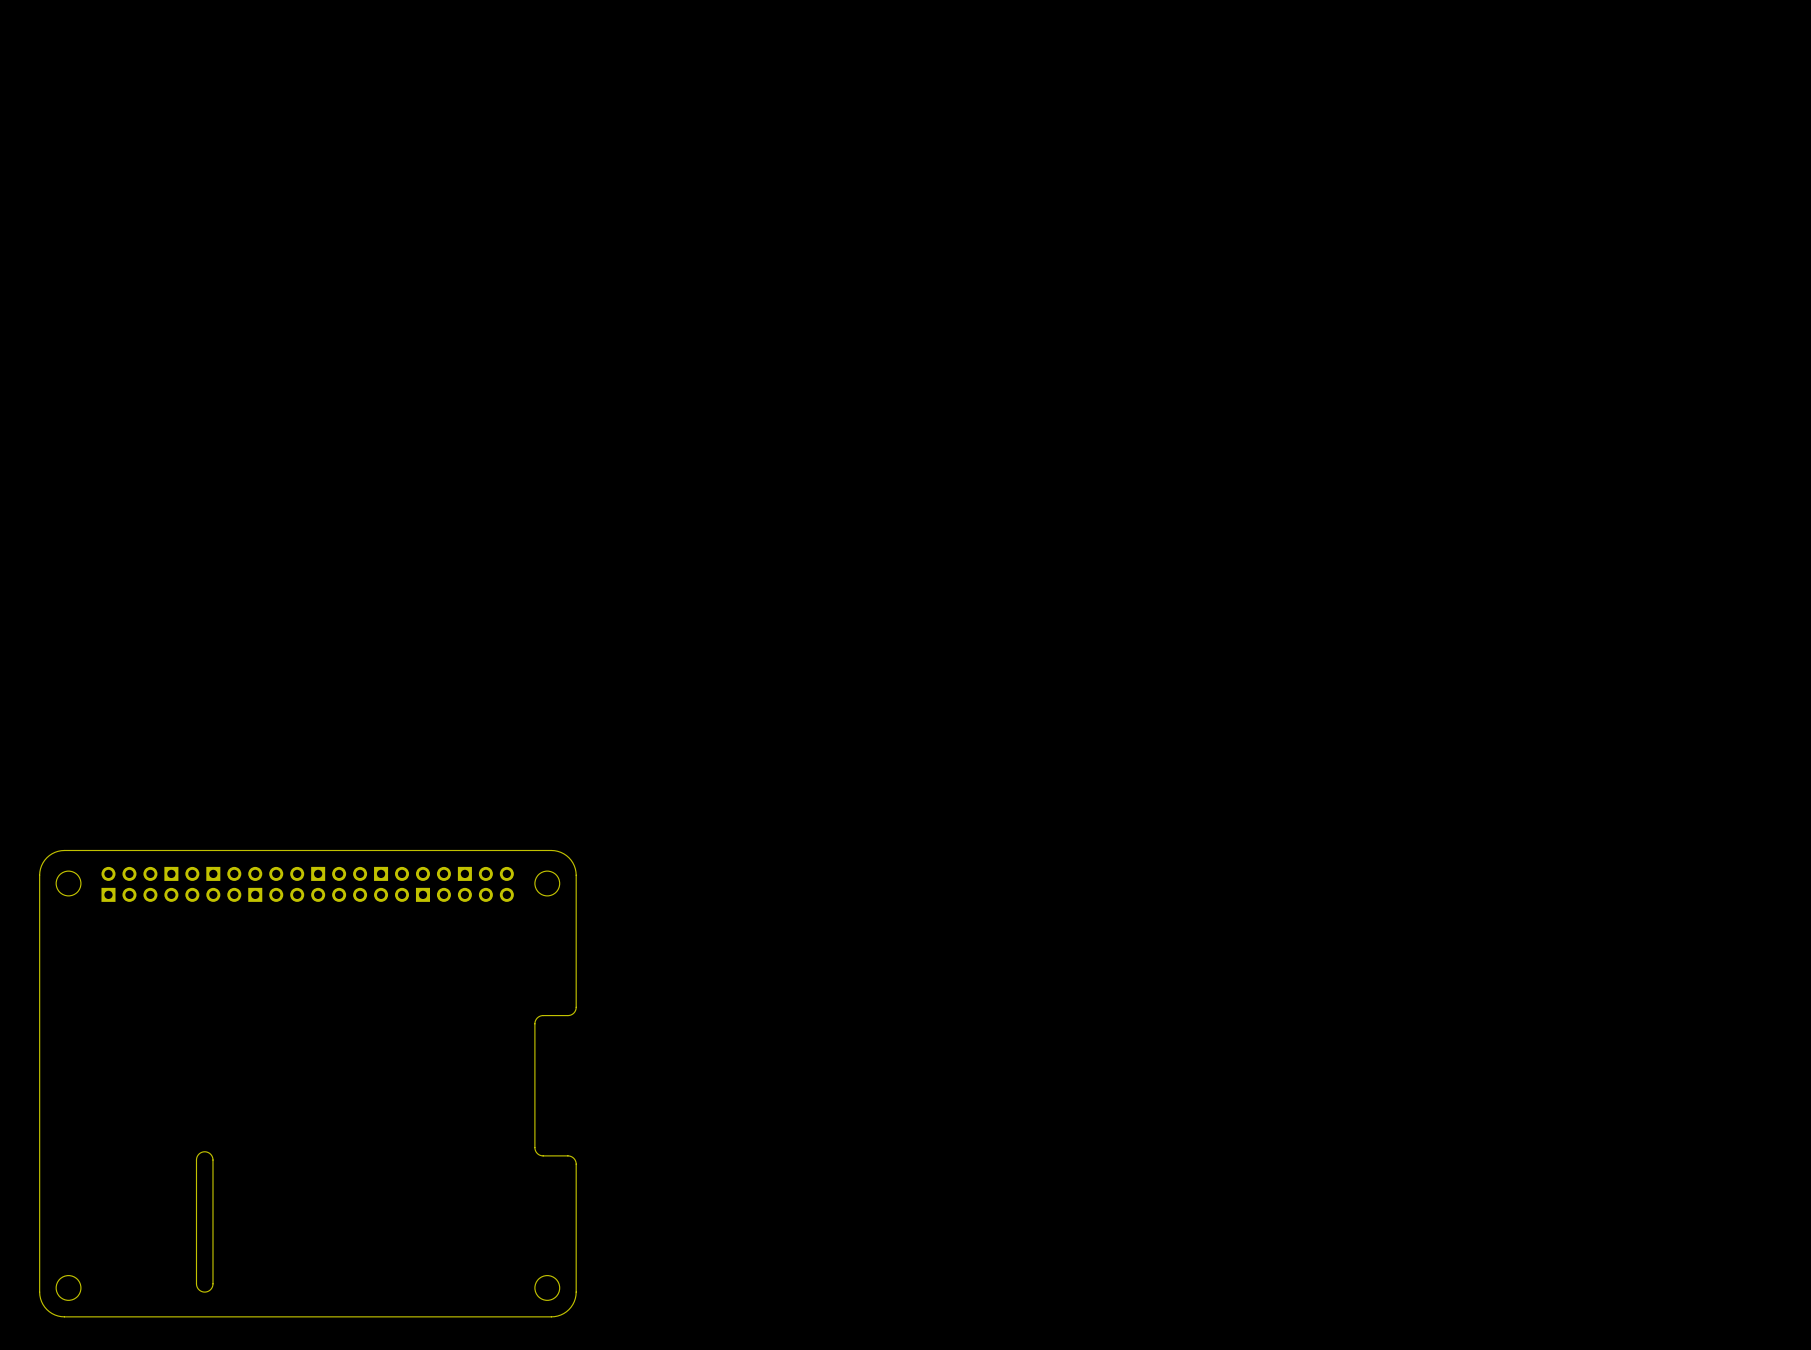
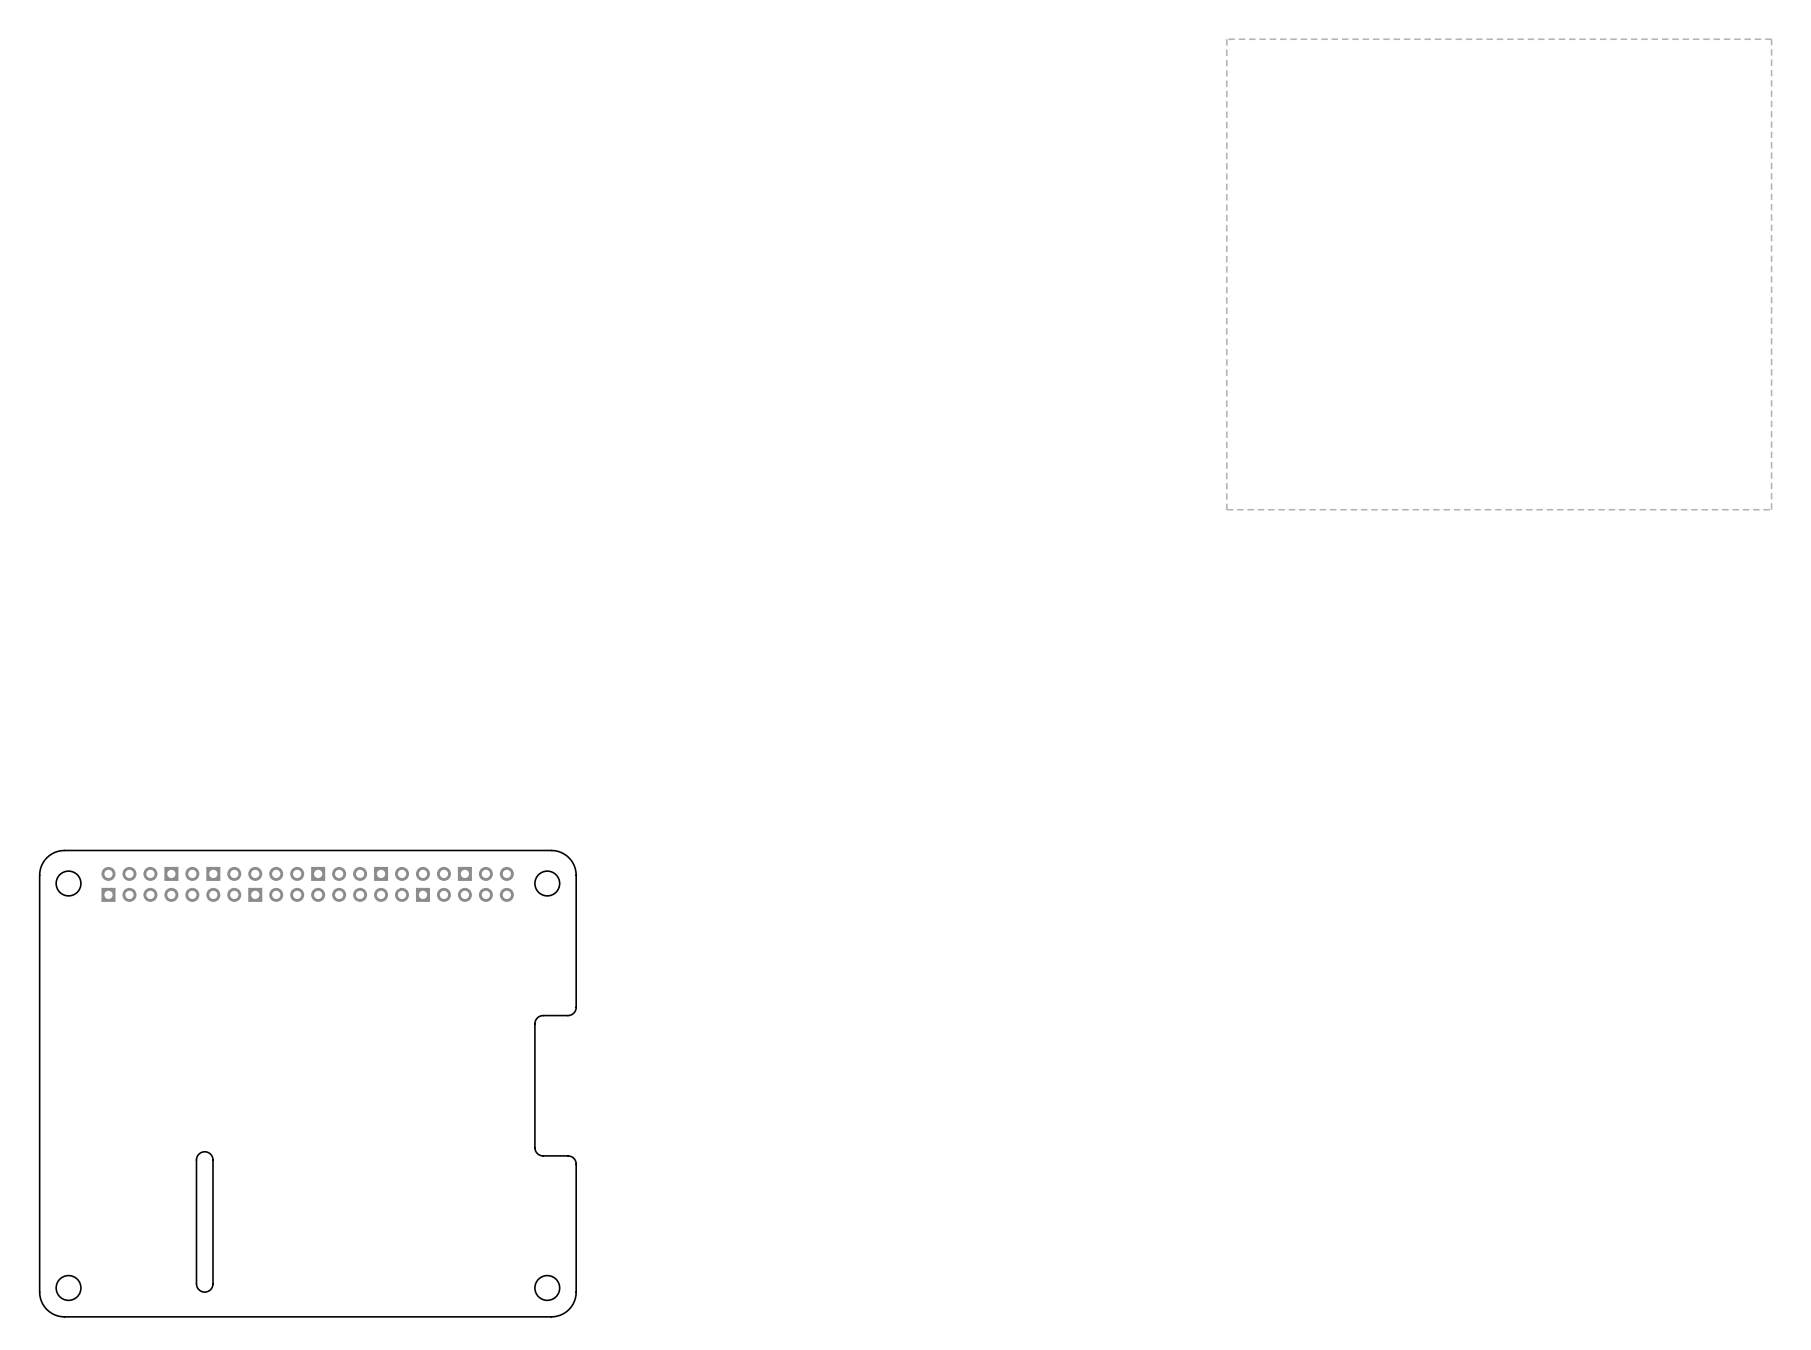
zone outline: none -> (1771, 39) (1771, 509) (1226, 509) (1226, 39) (1771, 39)

